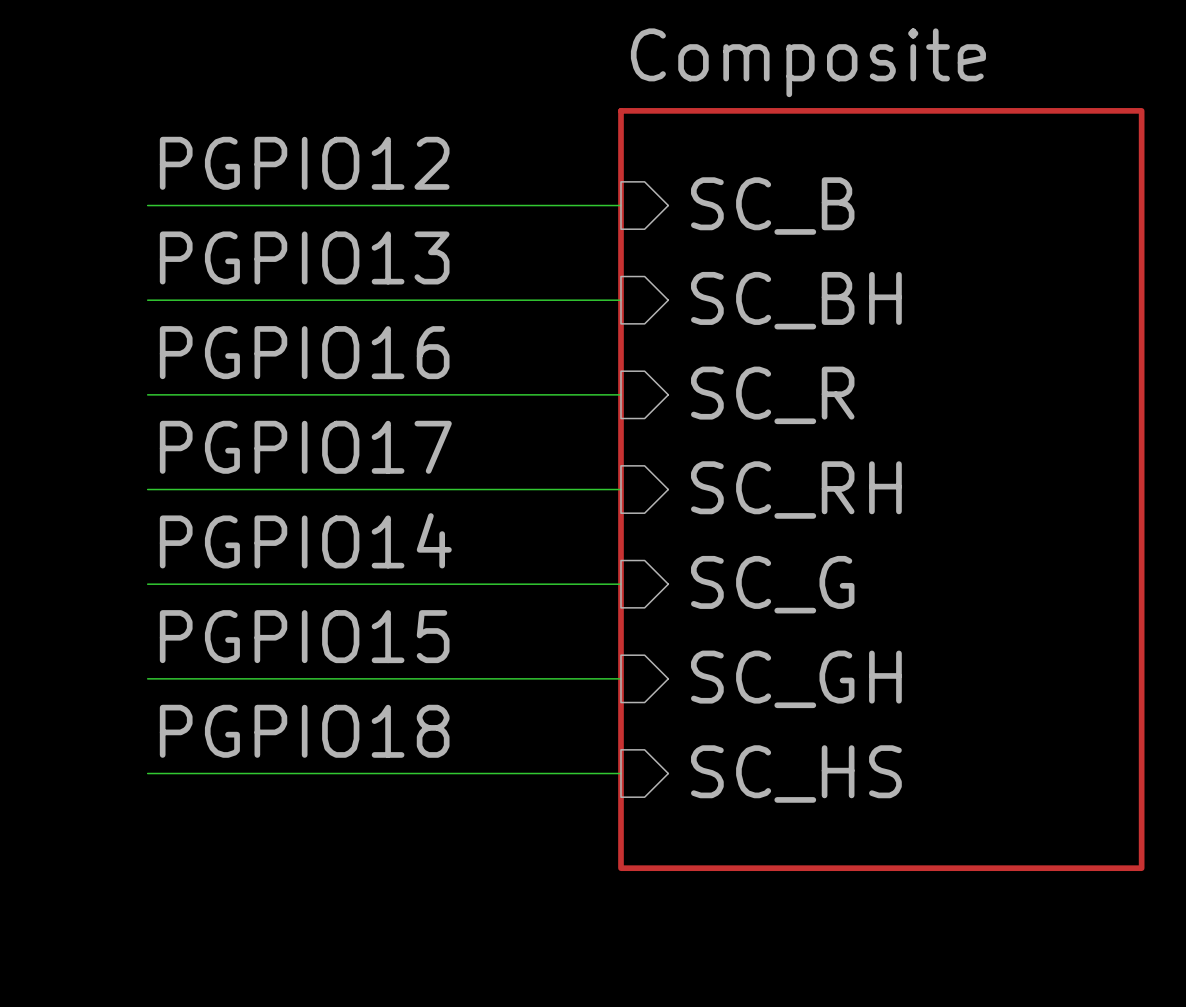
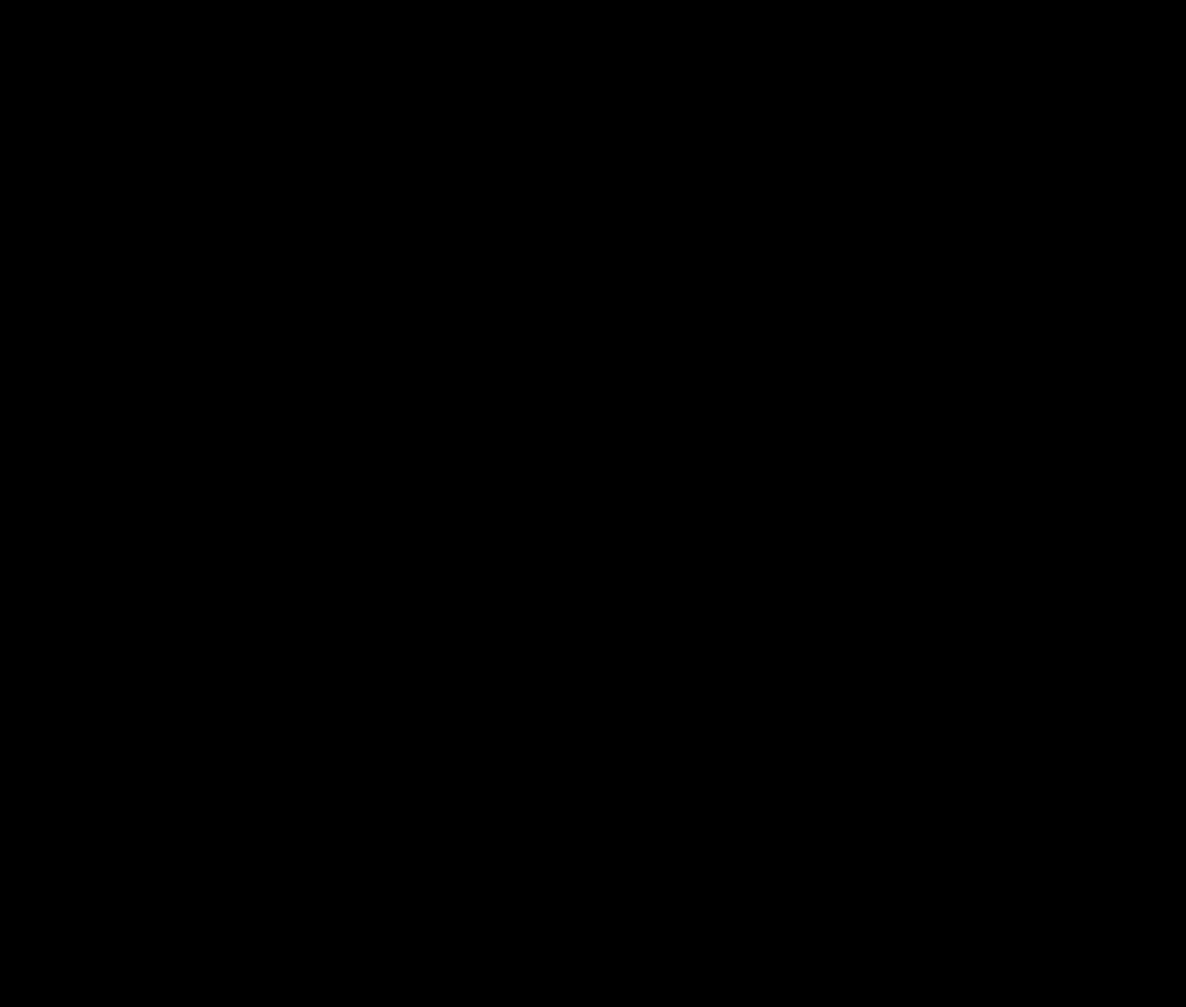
label: PGPIO12 (304, 163) -> none
wire: (147, 205) (620, 205) -> none
sheet pin: SC_B (772, 206) -> none
label: PGPIO13 (304, 257) -> none
wire: (147, 300) (620, 300) -> none
sheet pin: SC_BH (796, 300) -> none
label: PGPIO16 (304, 352) -> none
wire: (147, 394) (620, 394) -> none
sheet pin: SC_R (772, 395) -> none
label: PGPIO17 (305, 447) -> none
wire: (147, 489) (620, 489) -> none
sheet Composite: (881, 489) -> none
sheet pin: SC_RH (796, 490) -> none
label: PGPIO14 (305, 540) -> none
wire: (147, 584) (620, 584) -> none
sheet pin: SC_G (772, 584) -> none
label: PGPIO15 (304, 636) -> none
wire: (147, 678) (620, 678) -> none
sheet pin: SC_GH (796, 679) -> none
label: PGPIO18 (304, 731) -> none
wire: (147, 773) (620, 773) -> none
sheet pin: SC_HS (796, 774) -> none

